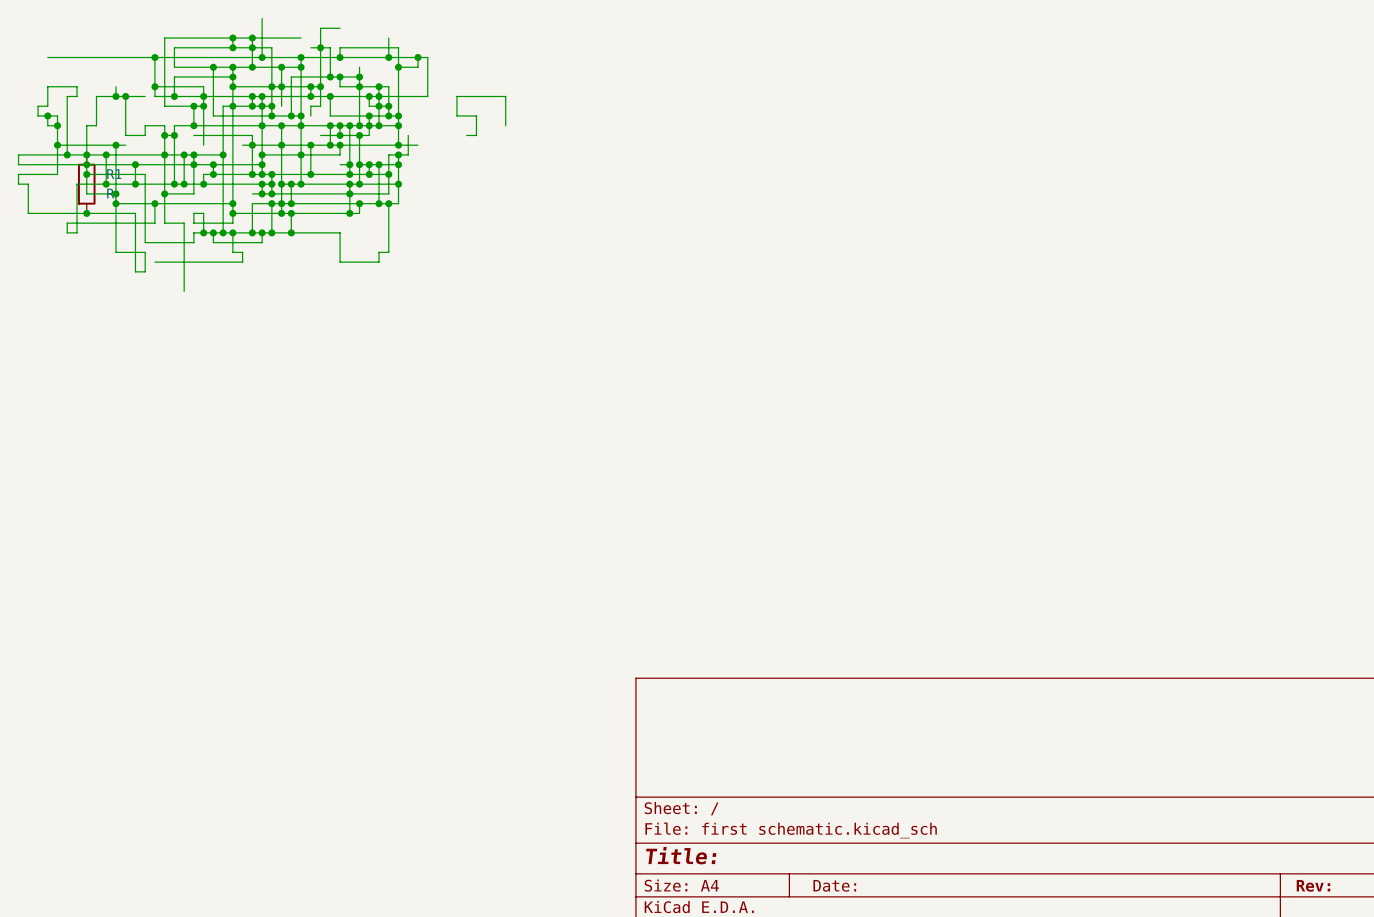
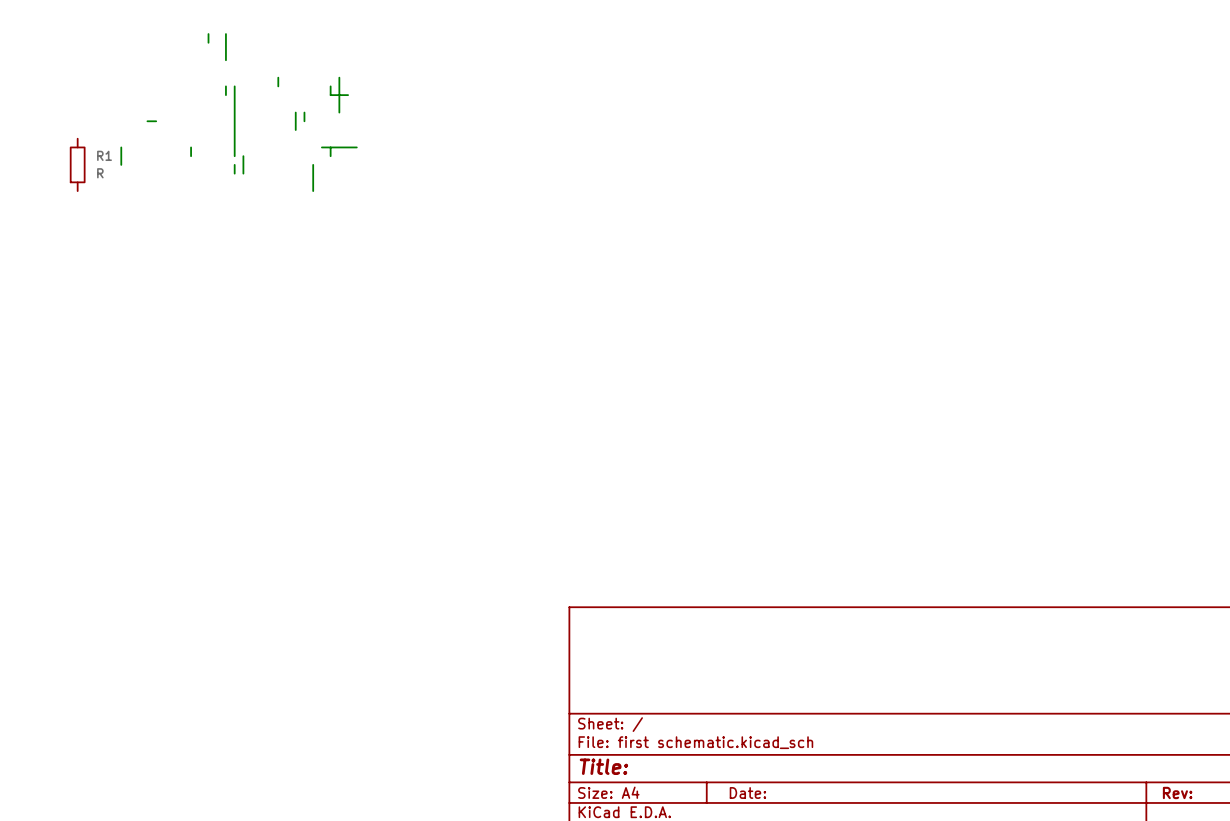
wire: (262, 18) (262, 57) -> none
wire: (340, 28) (320, 28) (320, 106) (310, 106) (310, 115) -> none
junction: (232, 38) -> none
junction: (252, 38) -> none
wire: (301, 38) (164, 38) (164, 106) (203, 106) -> none
wire: (388, 38) (388, 57) -> none
junction: (232, 47) -> none
junction: (252, 47) -> none
wire: (310, 47) (330, 47) (330, 77) -> none
junction: (320, 47) -> none
wire: (47, 57) (427, 57) (427, 96) (154, 96) (154, 57) -> none
junction: (154, 57) -> none
junction: (262, 57) -> none
wire: (301, 57) (301, 184) -> none
junction: (301, 57) -> none
wire: (340, 57) (340, 47) (398, 47) (398, 145) -> none
junction: (340, 57) -> none
junction: (388, 57) -> none
wire: (418, 57) (418, 67) (398, 67) -> none
junction: (418, 57) -> none
wire: (213, 67) (213, 115) (301, 115) -> none
junction: (213, 67) -> none
wire: (232, 67) (232, 223) (193, 223) (193, 213) (203, 213) (203, 232) -> none
junction: (232, 67) -> none
junction: (252, 67) -> none
wire: (281, 67) (281, 106) -> none
junction: (281, 67) -> none
wire: (301, 67) (174, 67) (174, 47) (271, 47) (271, 115) -> none
junction: (301, 67) -> none
wire: (359, 67) (359, 125) -> none
junction: (398, 67) -> none
wire: (232, 77) (174, 77) (174, 96) -> none
junction: (232, 77) -> none
junction: (330, 77) -> none
wire: (340, 77) (340, 86) (388, 86) (388, 115) -> none
junction: (340, 77) -> none
wire: (359, 77) (291, 77) (291, 115) -> none
junction: (359, 77) -> none
wire: (115, 86) (115, 96) -> none
wire: (154, 86) (203, 86) (203, 145) -> none
junction: (154, 86) -> none
wire: (232, 86) (320, 86) -> none
junction: (232, 86) -> none
junction: (271, 86) -> none
junction: (281, 86) -> none
junction: (310, 86) -> none
junction: (320, 86) -> none
junction: (359, 86) -> none
junction: (379, 86) -> none
junction: (115, 96) -> none
wire: (125, 96) (125, 135) (145, 135) (145, 125) (164, 125) (164, 223) (184, 223) (184, 291) -> none
junction: (125, 96) -> none
wire: (145, 96) (96, 96) (96, 125) (86, 125) (86, 193) (115, 193) -> none
junction: (174, 96) -> none
junction: (203, 96) -> none
junction: (252, 96) -> none
junction: (262, 96) -> none
junction: (310, 96) -> none
wire: (330, 96) (330, 115) (398, 115) -> none
junction: (330, 96) -> none
junction: (369, 96) -> none
junction: (379, 96) -> none
wire: (193, 106) (193, 125) -> none
junction: (193, 106) -> none
junction: (203, 106) -> none
junction: (232, 106) -> none
junction: (252, 106) -> none
junction: (262, 106) -> none
wire: (271, 106) (223, 106) (223, 232) -> none
junction: (271, 106) -> none
junction: (379, 106) -> none
junction: (388, 106) -> none
wire: (47, 115) (47, 125) (57, 125) -> none
junction: (47, 115) -> none
junction: (271, 115) -> none
junction: (291, 115) -> none
junction: (301, 115) -> none
wire: (369, 115) (369, 135) (320, 135) -> none
junction: (369, 115) -> none
junction: (388, 115) -> none
junction: (398, 115) -> none
junction: (57, 125) -> none
junction: (193, 125) -> none
junction: (262, 125) -> none
wire: (281, 125) (281, 213) -> none
junction: (281, 125) -> none
junction: (301, 125) -> none
junction: (330, 125) -> none
junction: (340, 125) -> none
wire: (349, 125) (349, 174) -> none
junction: (349, 125) -> none
junction: (359, 125) -> none
junction: (369, 125) -> none
junction: (379, 125) -> none
wire: (398, 125) (174, 125) (174, 184) -> none
junction: (398, 125) -> none
wire: (505, 125) (505, 96) (456, 96) (456, 115) (476, 115) (476, 135) (466, 135) -> none
junction: (164, 135) -> none
junction: (174, 135) -> none
wire: (193, 135) (252, 135) (252, 174) -> none
junction: (340, 135) -> none
wire: (359, 135) (359, 184) -> none
junction: (359, 135) -> none
wire: (408, 135) (408, 154) (388, 154) (388, 193) (252, 193) -> none
wire: (57, 145) (125, 145) -> none
junction: (57, 145) -> none
wire: (115, 145) (115, 252) (145, 252) (145, 271) (135, 271) (135, 213) (28, 213) (28, 184) (18, 184) (18, 174) (57, 174) (57, 115) (38, 115) (38, 106) (47, 106) (47, 86) (77, 86) (77, 96) (67, 96) (67, 154) -> none
junction: (115, 145) -> none
wire: (242, 145) (418, 145) -> none
junction: (252, 145) -> none
junction: (281, 145) -> none
wire: (310, 145) (310, 174) -> none
junction: (310, 145) -> none
junction: (330, 145) -> none
wire: (340, 145) (340, 154) (262, 154) -> none
junction: (340, 145) -> none
junction: (398, 145) -> none
junction: (67, 154) -> none
junction: (86, 154) -> none
wire: (106, 154) (106, 184) -> none
junction: (106, 154) -> none
junction: (164, 154) -> none
wire: (184, 154) (184, 184) -> none
junction: (184, 154) -> none
wire: (193, 154) (193, 193) (164, 193) -> none
junction: (193, 154) -> none
wire: (223, 154) (18, 154) (18, 164) (262, 164) -> none
junction: (223, 154) -> none
junction: (262, 154) -> none
junction: (301, 154) -> none
wire: (398, 154) (398, 203) (252, 203) (252, 232) -> none
junction: (398, 154) -> none
junction: (86, 164) -> none
junction: (135, 164) -> none
junction: (193, 164) -> none
junction: (213, 164) -> none
junction: (262, 164) -> none
wire: (340, 164) (349, 164) -> none
junction: (349, 164) -> none
junction: (359, 164) -> none
junction: (369, 164) -> none
wire: (379, 164) (379, 203) -> none
junction: (379, 164) -> none
junction: (398, 164) -> none
wire: (86, 174) (145, 174) (145, 242) (193, 242) (193, 232) (340, 232) (340, 262) (379, 262) (379, 252) (388, 252) (388, 203) -> none
junction: (86, 174) -> none
junction: (213, 174) -> none
junction: (252, 174) -> none
junction: (262, 174) -> none
junction: (271, 174) -> none
junction: (310, 174) -> none
junction: (349, 174) -> none
junction: (369, 174) -> none
wire: (388, 174) (203, 174) (203, 184) -> none
junction: (388, 174) -> none
junction: (106, 184) -> none
junction: (135, 184) -> none
junction: (174, 184) -> none
junction: (184, 184) -> none
junction: (203, 184) -> none
junction: (262, 184) -> none
wire: (271, 184) (77, 184) (77, 232) (67, 232) (67, 223) (154, 223) (154, 203) -> none
junction: (271, 184) -> none
wire: (281, 184) (398, 184) -> none
junction: (281, 184) -> none
wire: (291, 184) (291, 203) -> none
junction: (291, 184) -> none
junction: (301, 184) -> none
junction: (349, 184) -> none
junction: (359, 184) -> none
junction: (398, 184) -> none
junction: (115, 193) -> none
junction: (164, 193) -> none
junction: (262, 193) -> none
junction: (271, 193) -> none
junction: (349, 193) -> none
wire: (115, 203) (232, 203) -> none
junction: (115, 203) -> none
junction: (154, 203) -> none
junction: (232, 203) -> none
wire: (271, 203) (271, 232) -> none
junction: (271, 203) -> none
junction: (281, 203) -> none
junction: (291, 203) -> none
wire: (359, 203) (359, 213) (232, 213) -> none
junction: (359, 203) -> none
junction: (379, 203) -> none
junction: (388, 203) -> none
junction: (86, 213) -> none
junction: (232, 213) -> none
junction: (281, 213) -> none
wire: (291, 213) (291, 232) -> none
junction: (291, 213) -> none
junction: (349, 213) -> none
junction: (203, 232) -> none
wire: (213, 232) (213, 242) (262, 242) (262, 232) -> none
junction: (213, 232) -> none
junction: (223, 232) -> none
wire: (232, 232) (232, 252) (242, 252) (242, 262) (154, 262) -> none
junction: (232, 232) -> none
junction: (252, 232) -> none
junction: (262, 232) -> none
junction: (271, 232) -> none
junction: (291, 232) -> none

